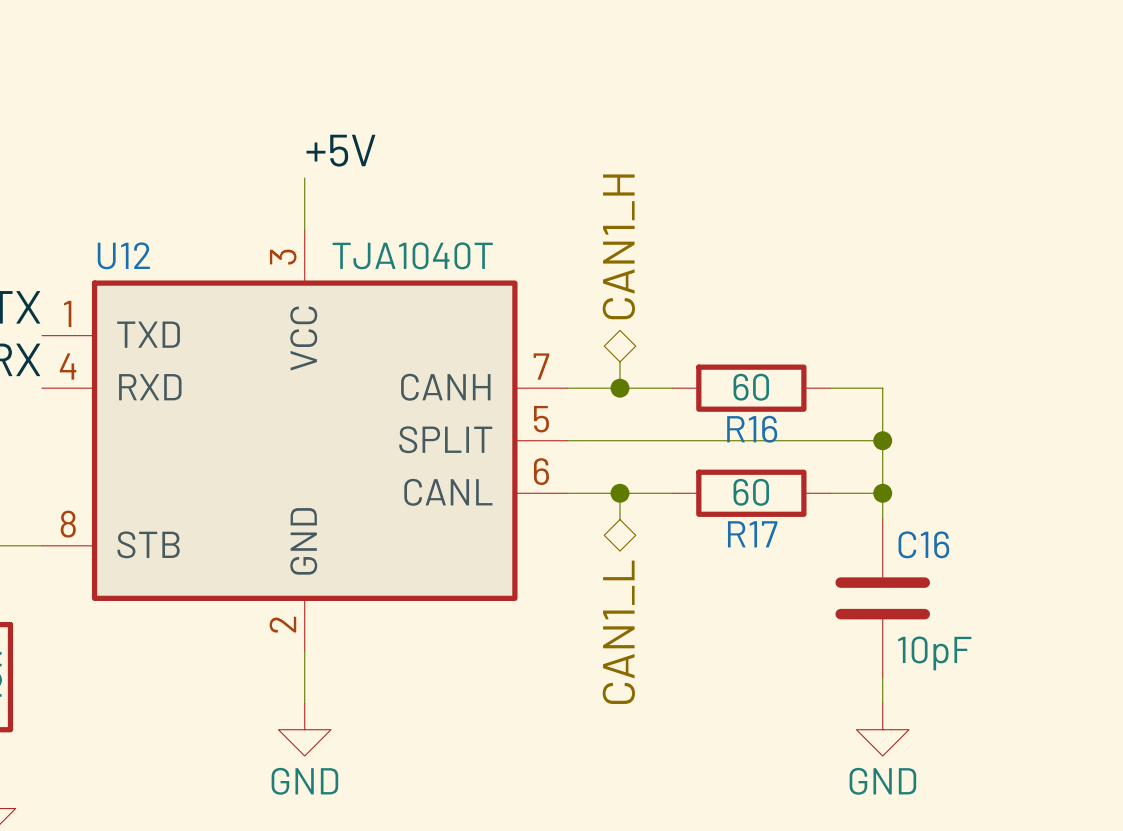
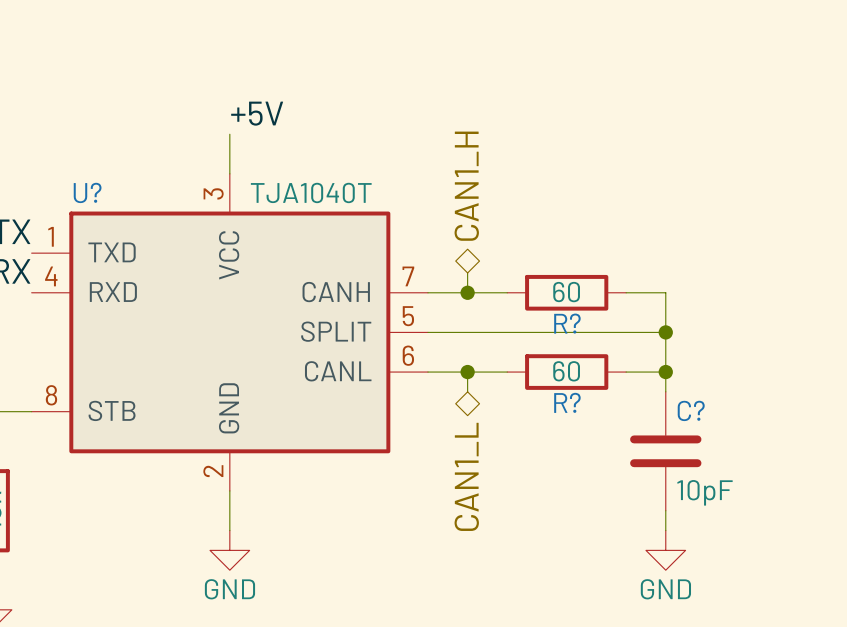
U12 name: U12 (123, 255) -> U? (87, 192)
R16 name: R16 (752, 429) -> R? (567, 323)
R17 name: R17 (752, 534) -> R? (567, 402)
C16 name: C16 (923, 544) -> C? (691, 410)

